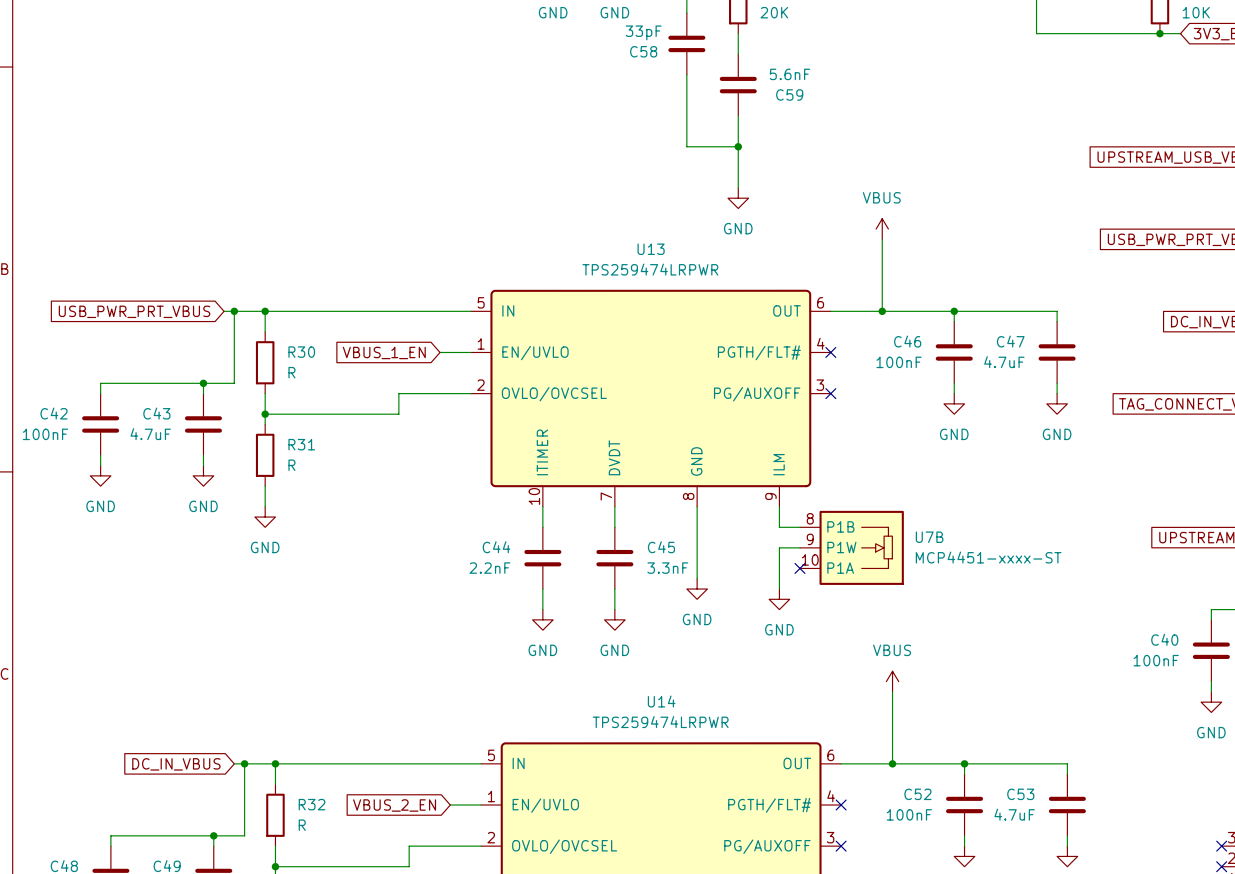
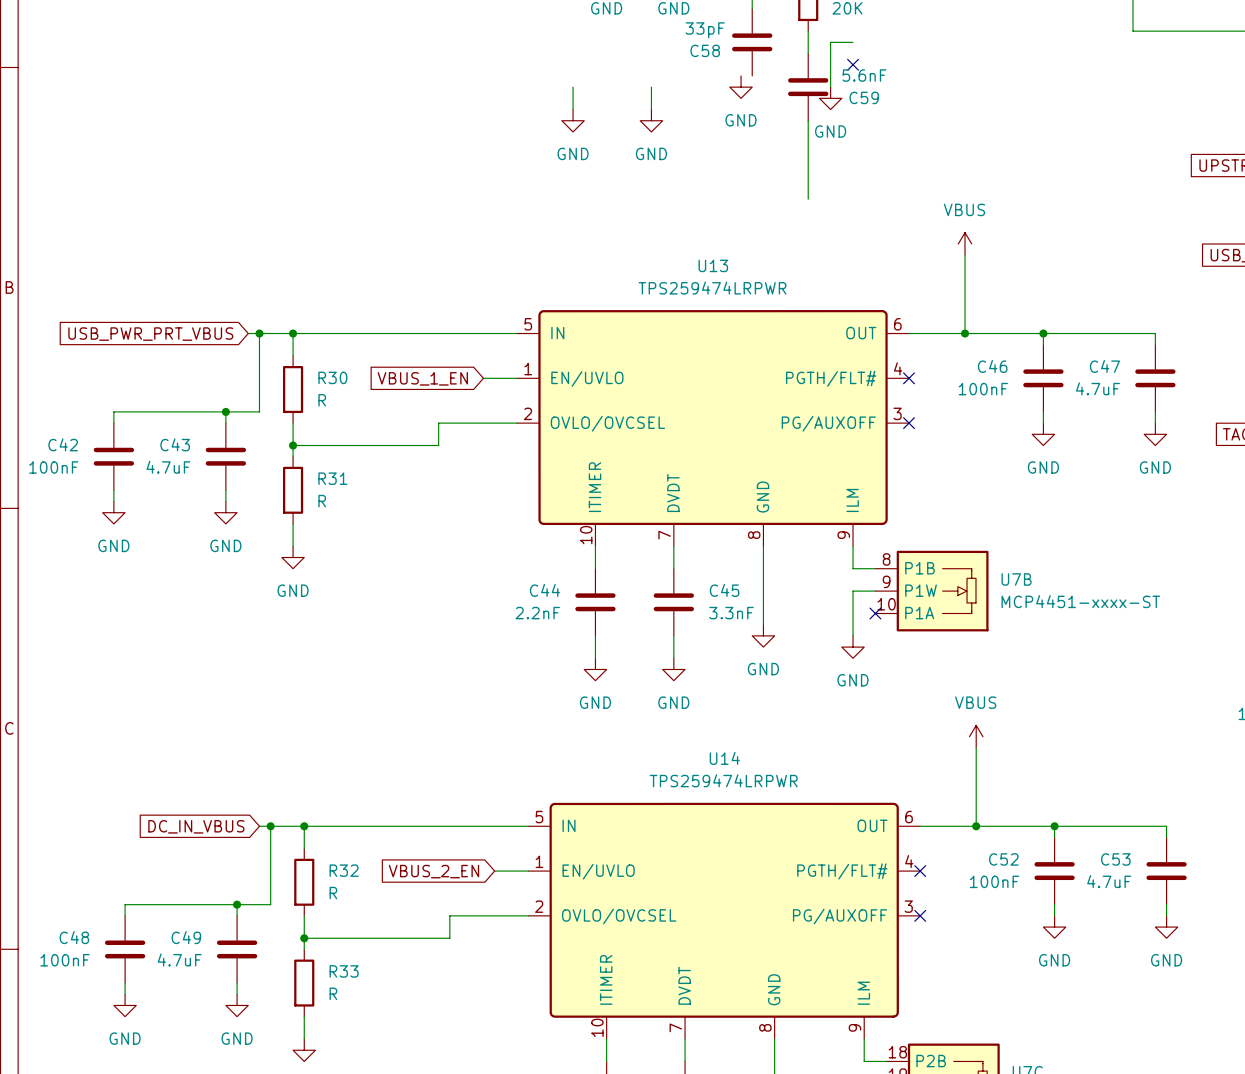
wire: none -> (853, 42) (830, 42) (830, 87)
no-connect mark: none -> (853, 64)
wire: (686, 74) (686, 146) (738, 146) -> none
wire: none -> (573, 87) (573, 109)
wire: none -> (651, 87) (651, 109)
power symbol: none -> GND (741, 87)
power symbol: none -> GND (830, 98)
power symbol: none -> GND (573, 120)
power symbol: none -> GND (651, 120)
junction: (738, 146) -> none
power symbol: GND (738, 198) -> none

